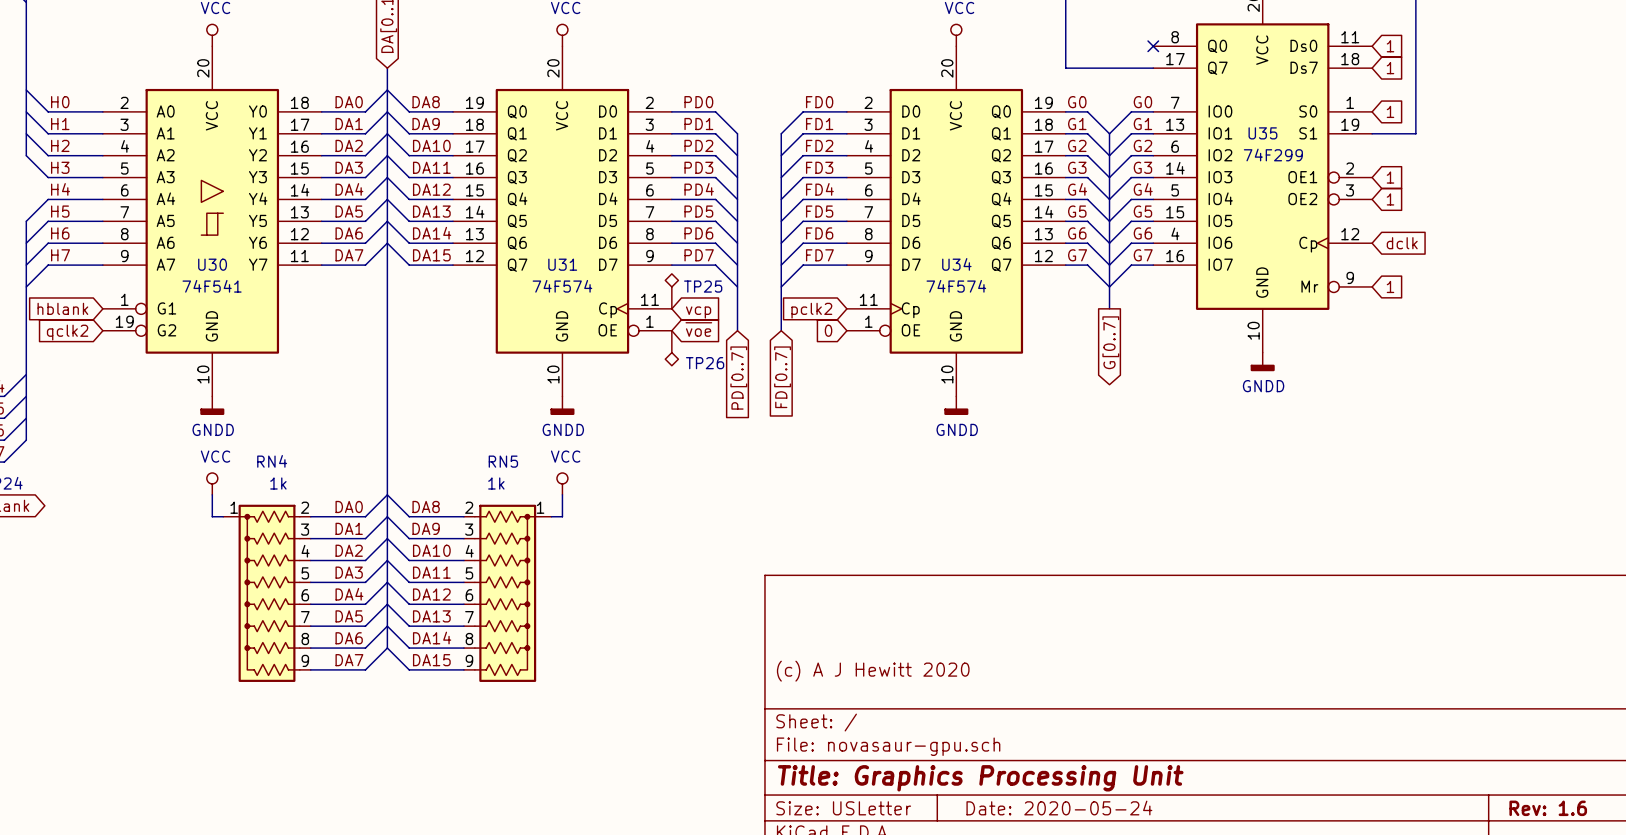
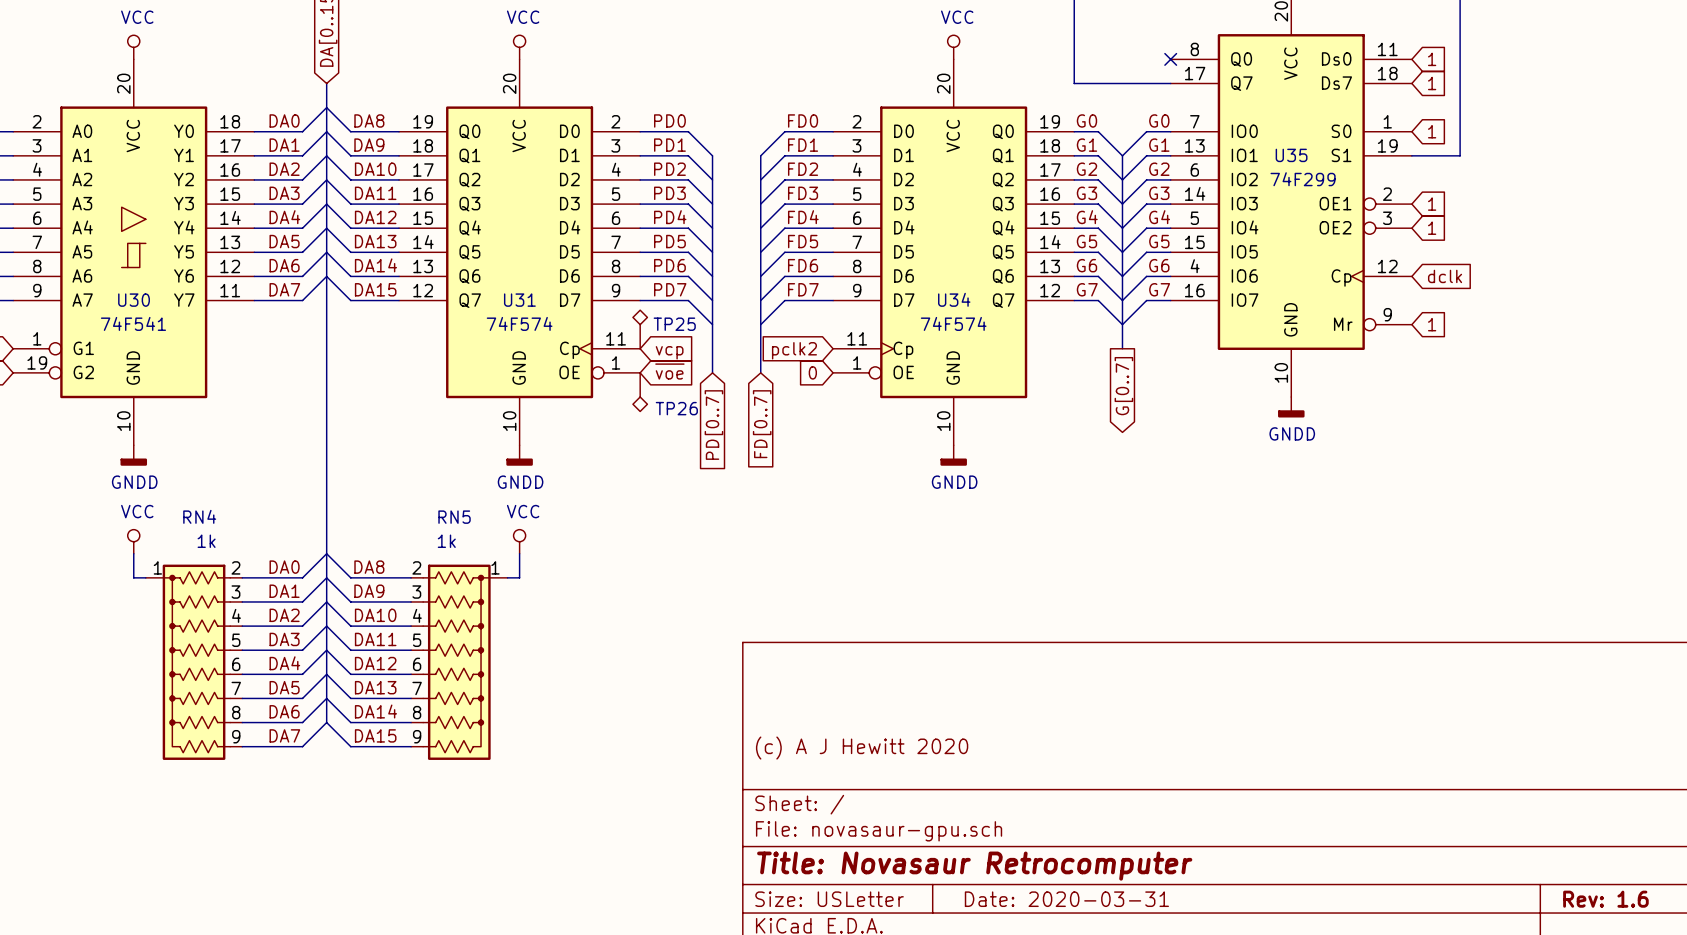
title block: Title: Graphics Processing Unit (980, 778) -> Title: Novasaur Retrocomputer (974, 866)
title block: Date: 2020-05-24 (1059, 808) -> Date: 2020-03-31 (1066, 899)

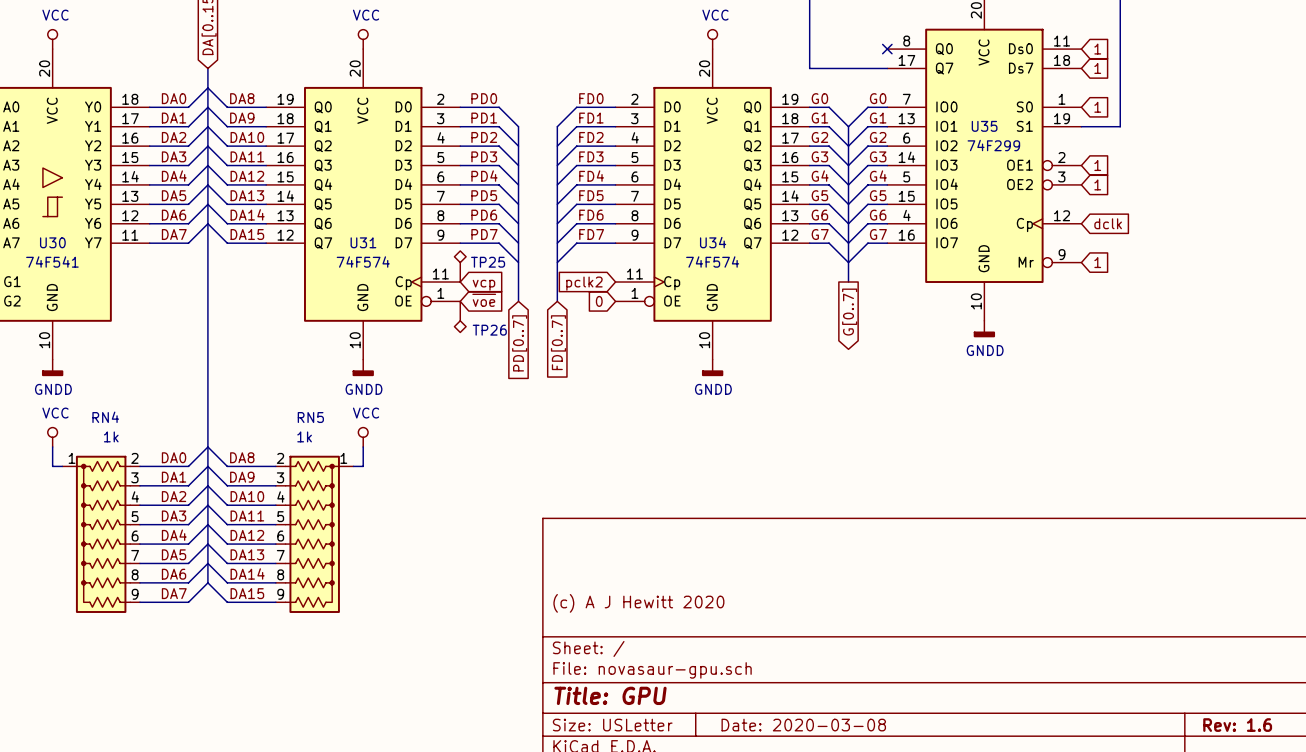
title block: Title: Novasaur Retrocomputer (974, 866) -> Title: GPU (610, 695)
title block: Date: 2020-03-31 (1066, 899) -> Date: 2020-03-08 (803, 725)

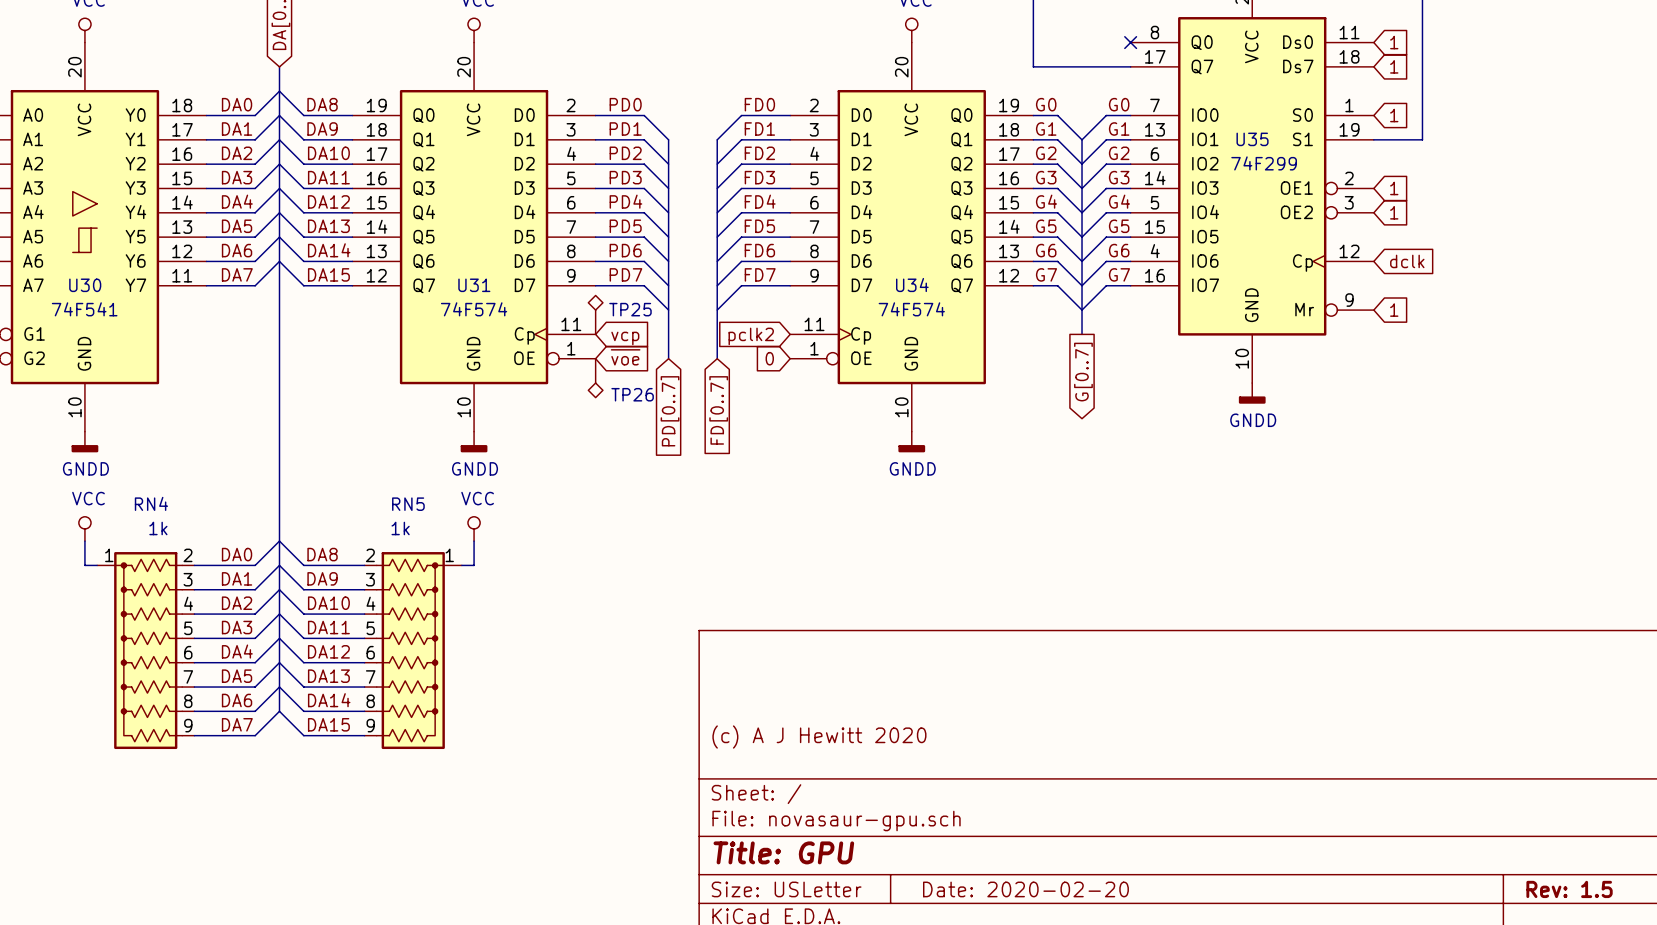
title block: Date: 2020-03-08 (803, 725) -> Date: 2020-02-20 (1025, 889)
title block: Rev: 1.6 (1237, 725) -> Rev: 1.5 (1569, 889)

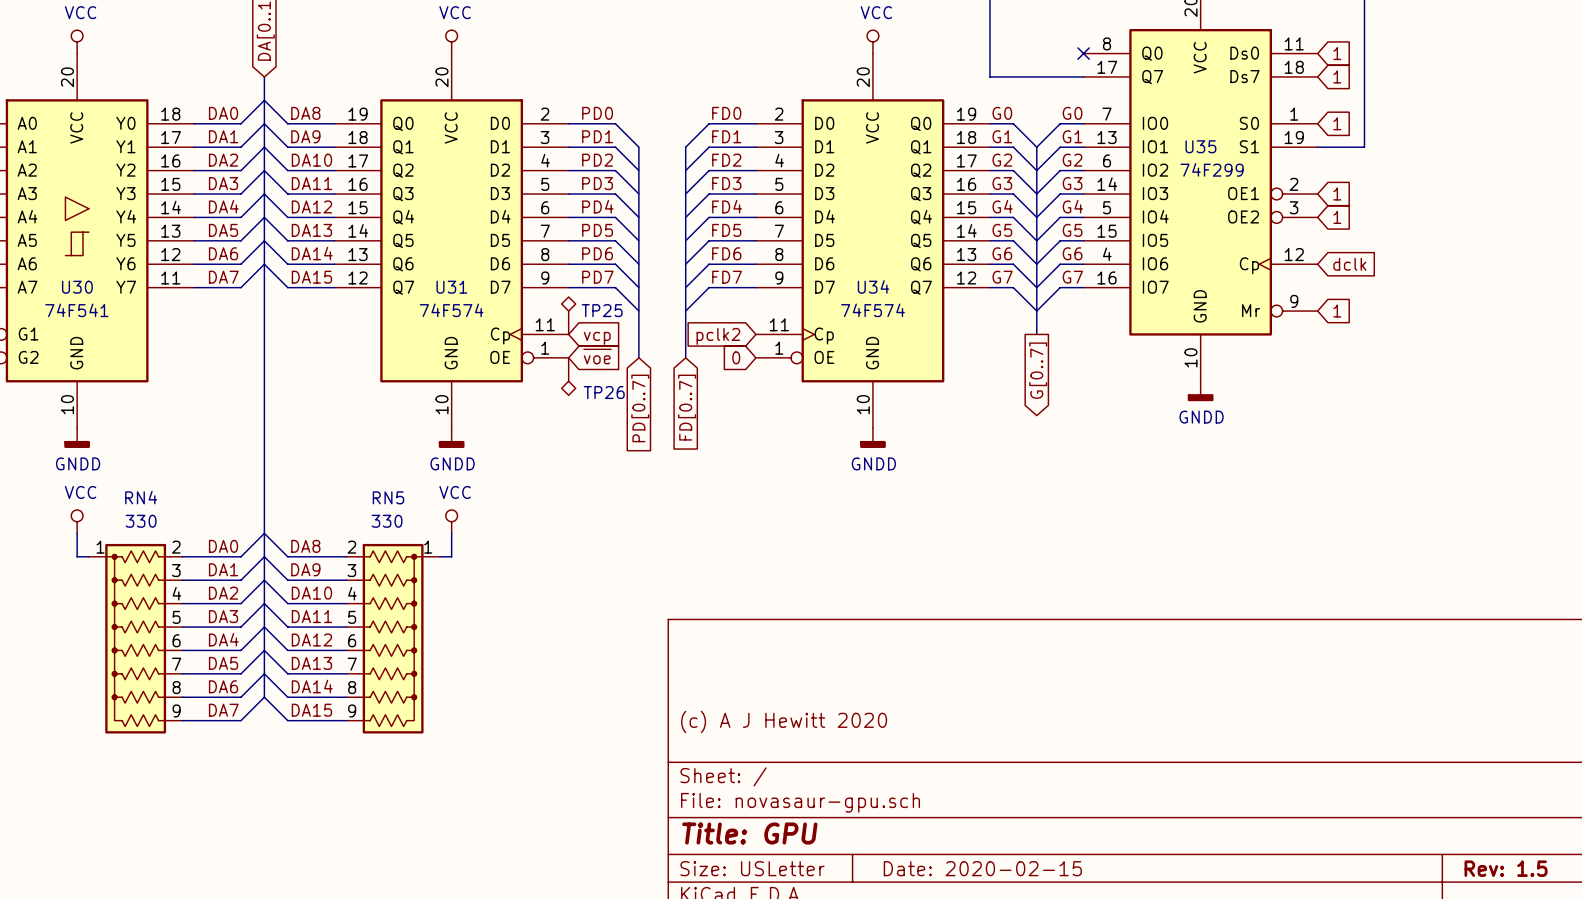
RN4 value: 1k (158, 528) -> 330 (141, 521)
RN5 value: 1k (400, 528) -> 330 (387, 521)
title block: Date: 2020-02-20 (1025, 889) -> Date: 2020-02-15 (982, 868)

